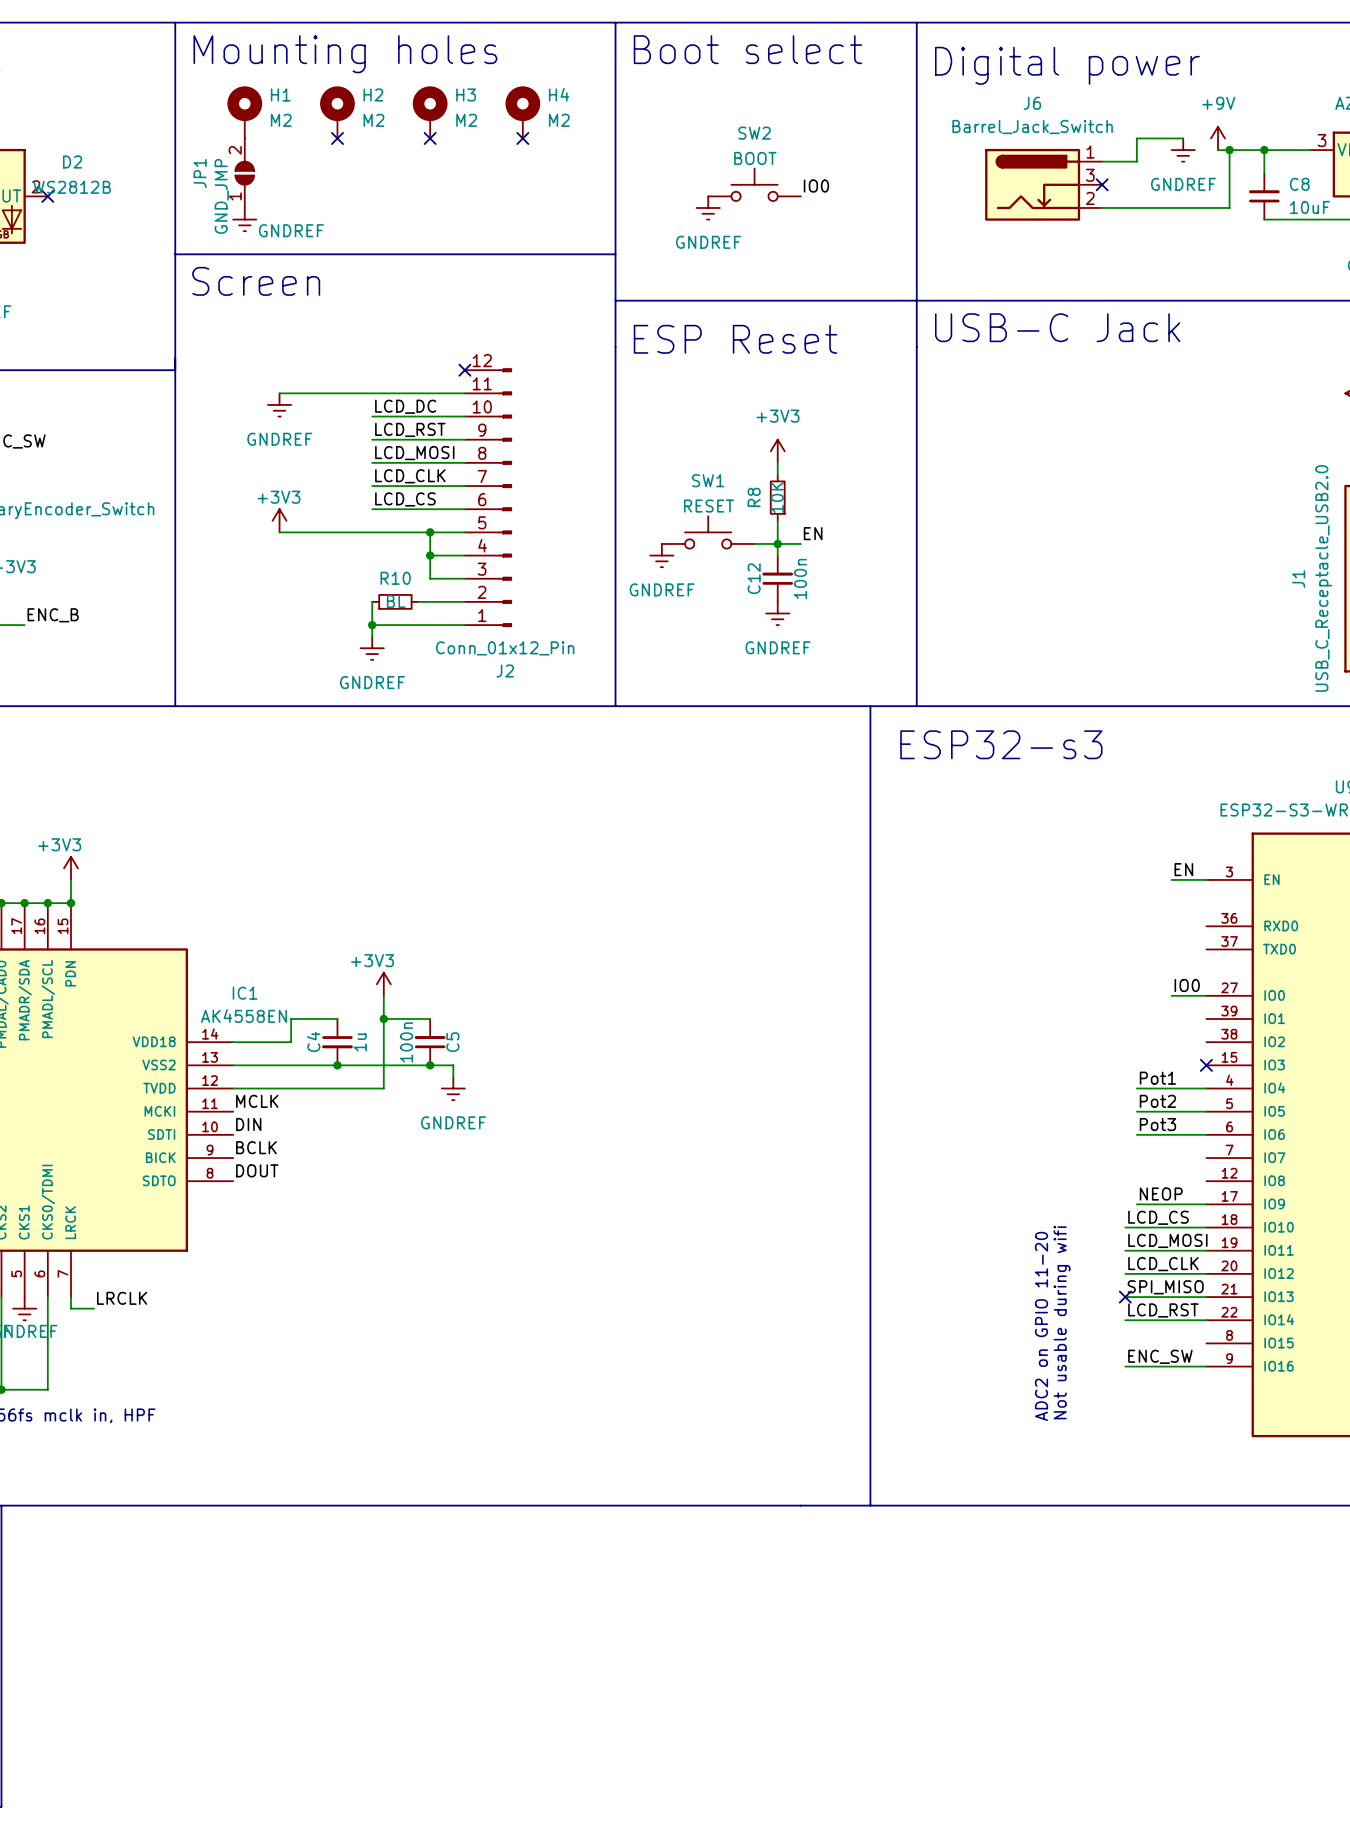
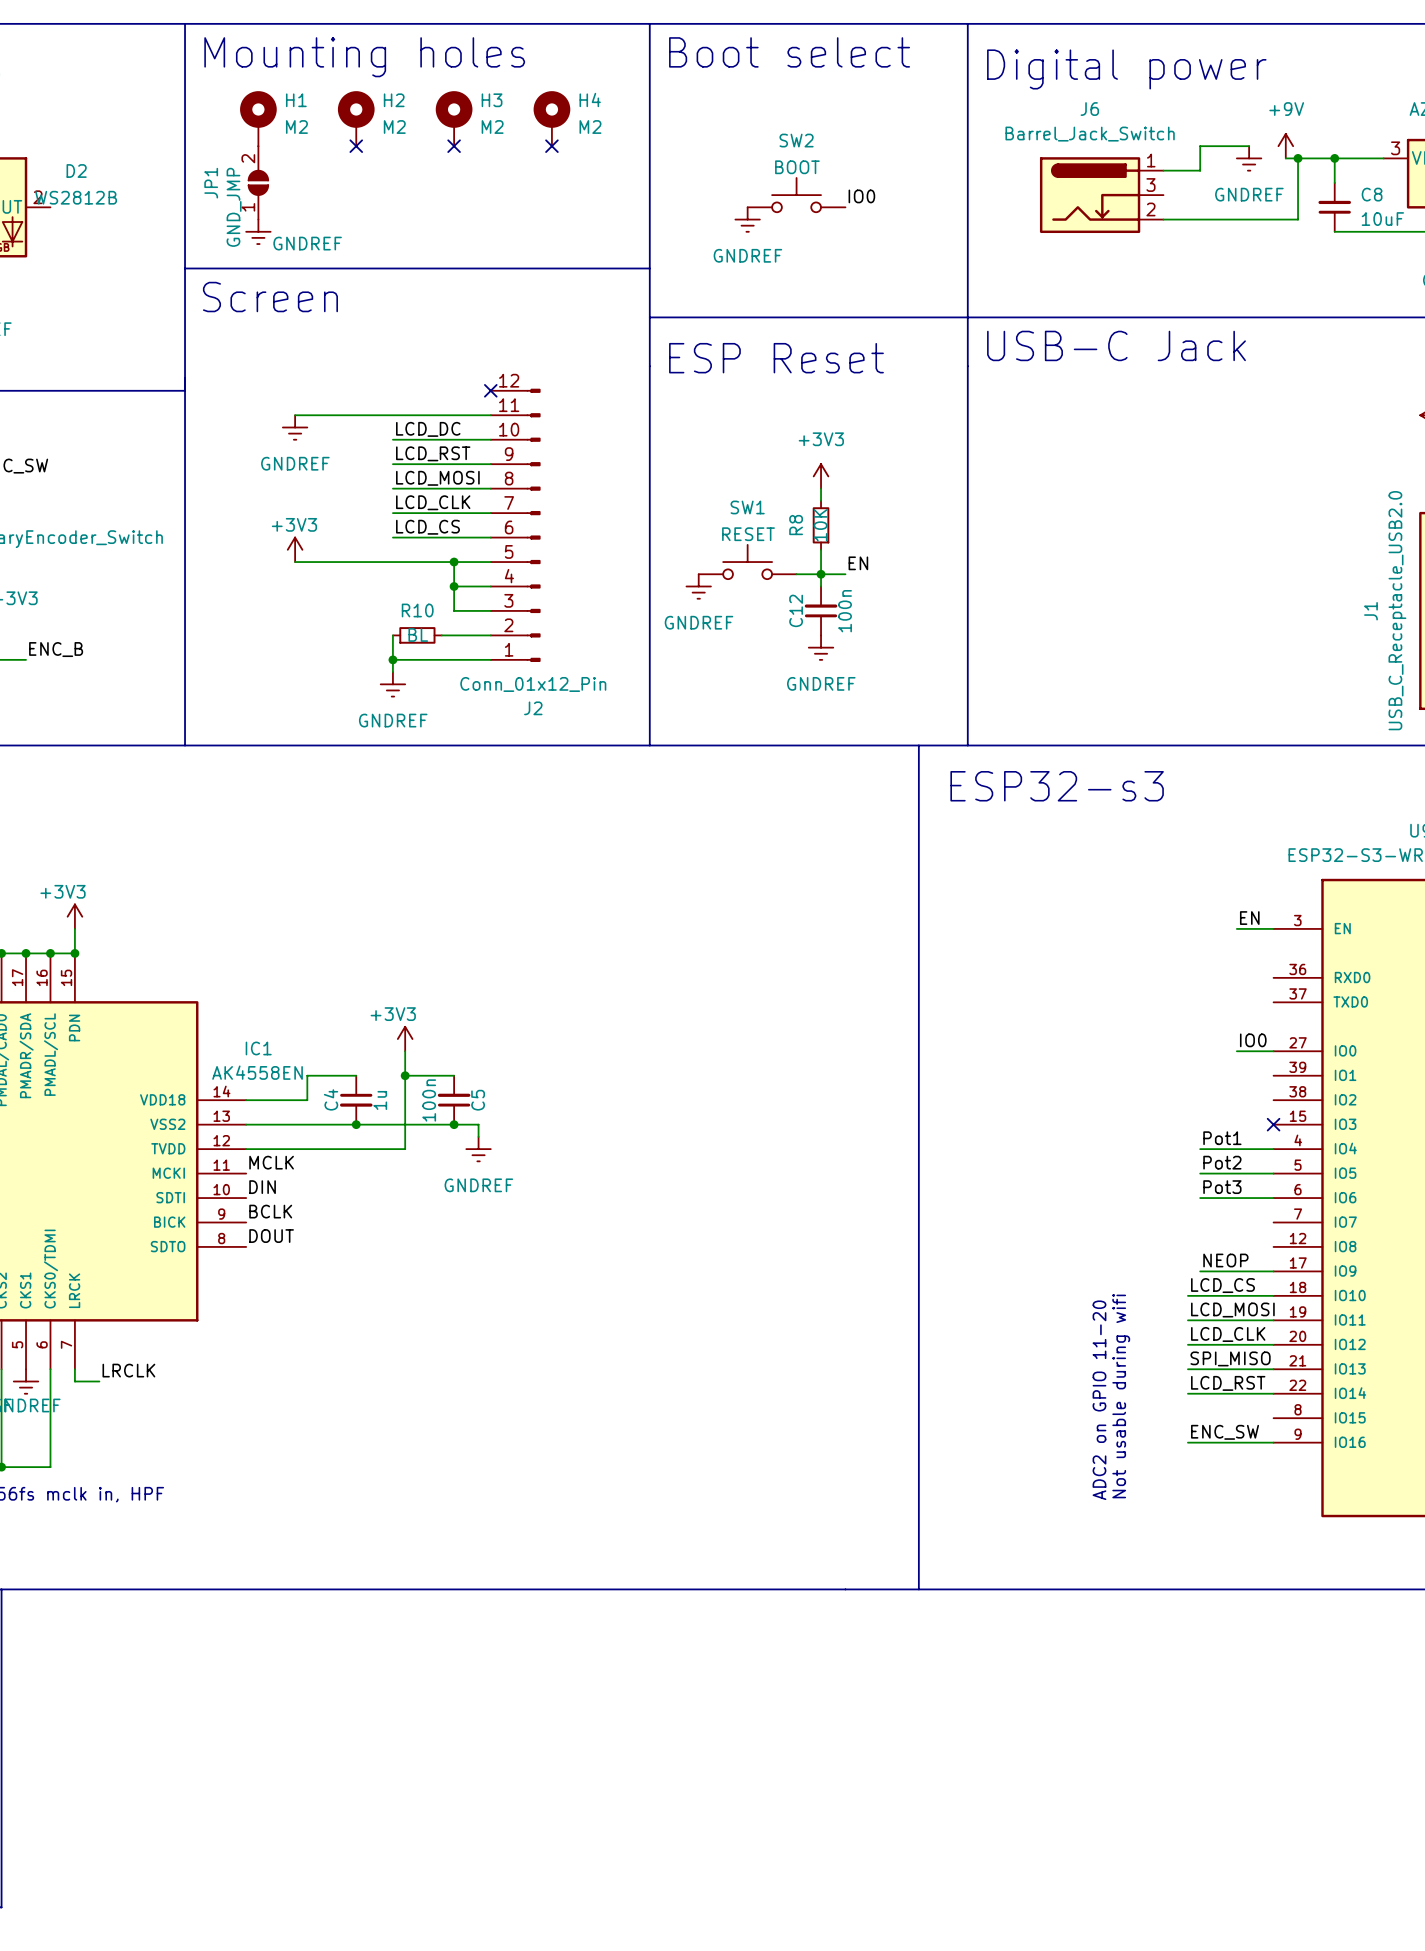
no-connect mark: (1102, 184) -> none
no-connect mark: (47, 196) -> none
no-connect mark: (1125, 1297) -> none

